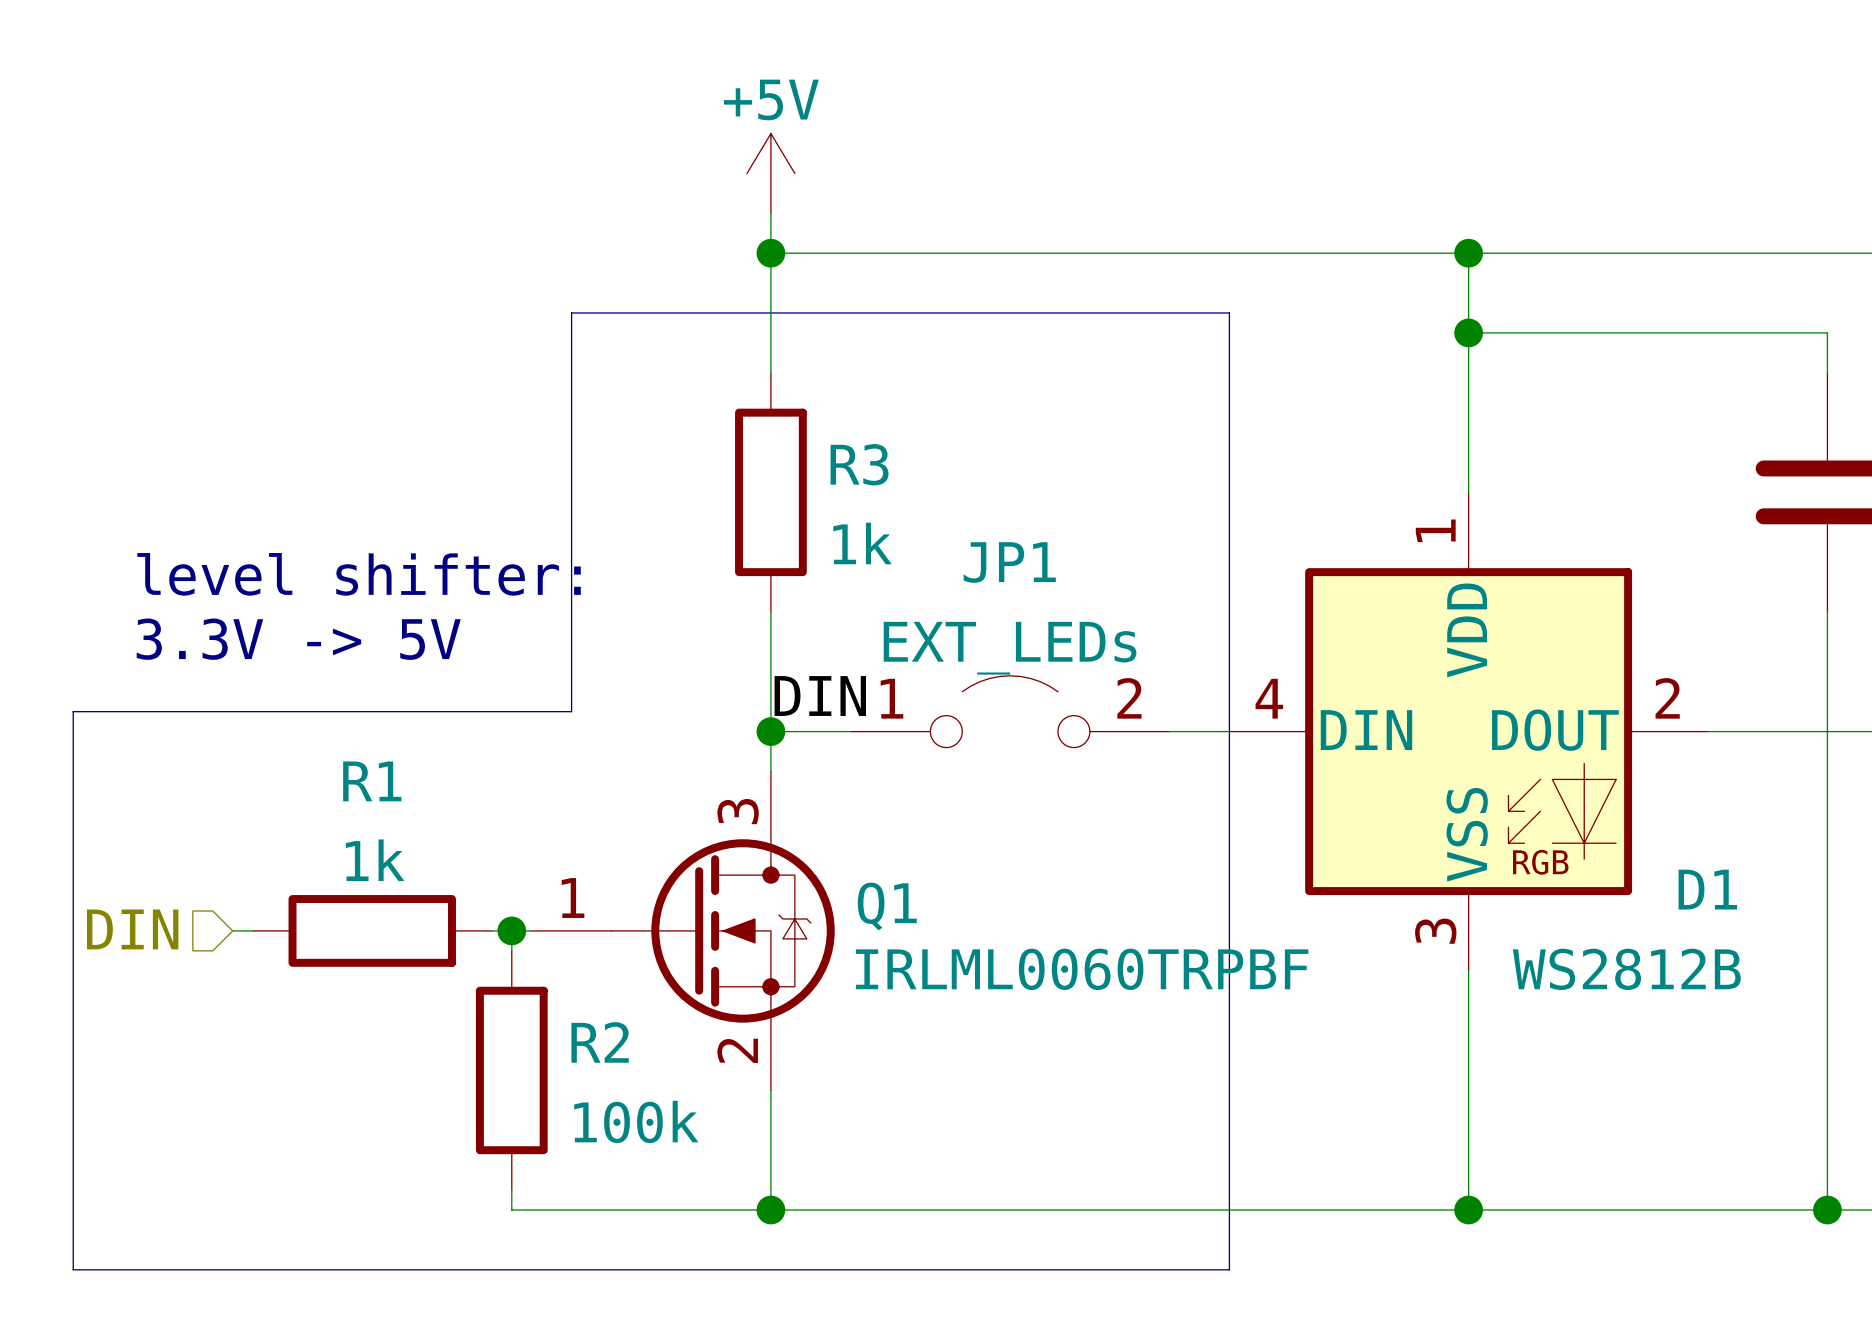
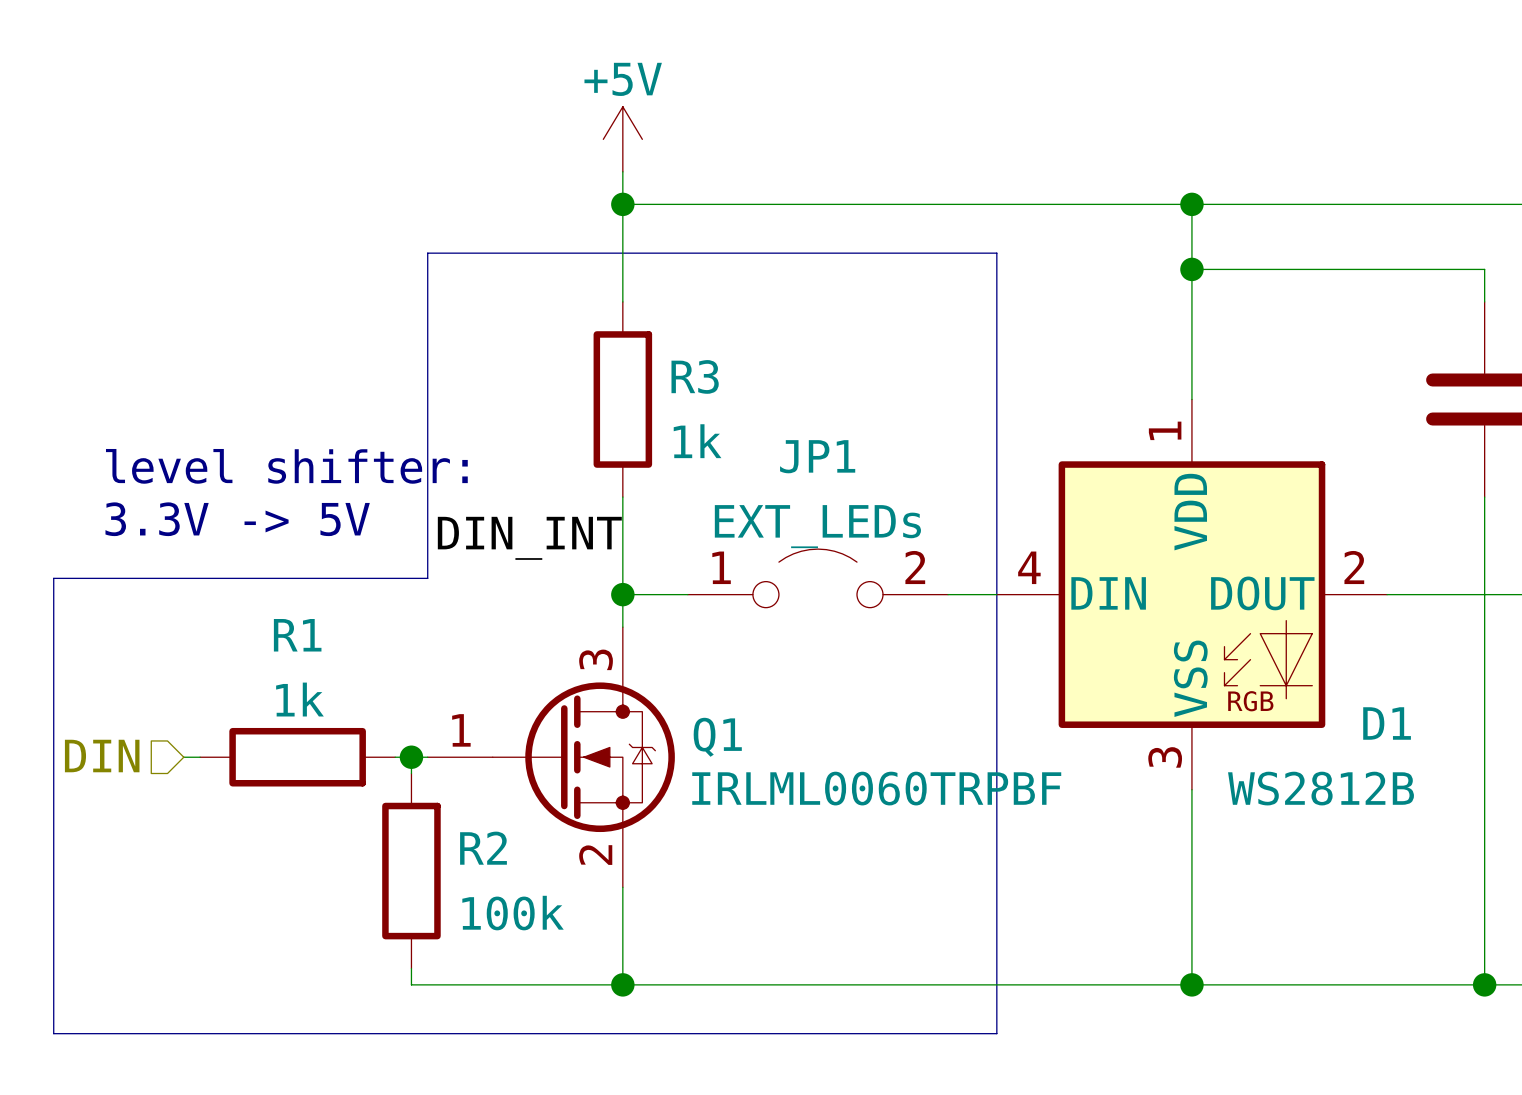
line: (571, 312) (571, 711) (531, 711) -> (460, 253) (427, 253) (427, 578)
label: none -> DIN_INT (529, 538)
label: DIN (820, 696) -> none

